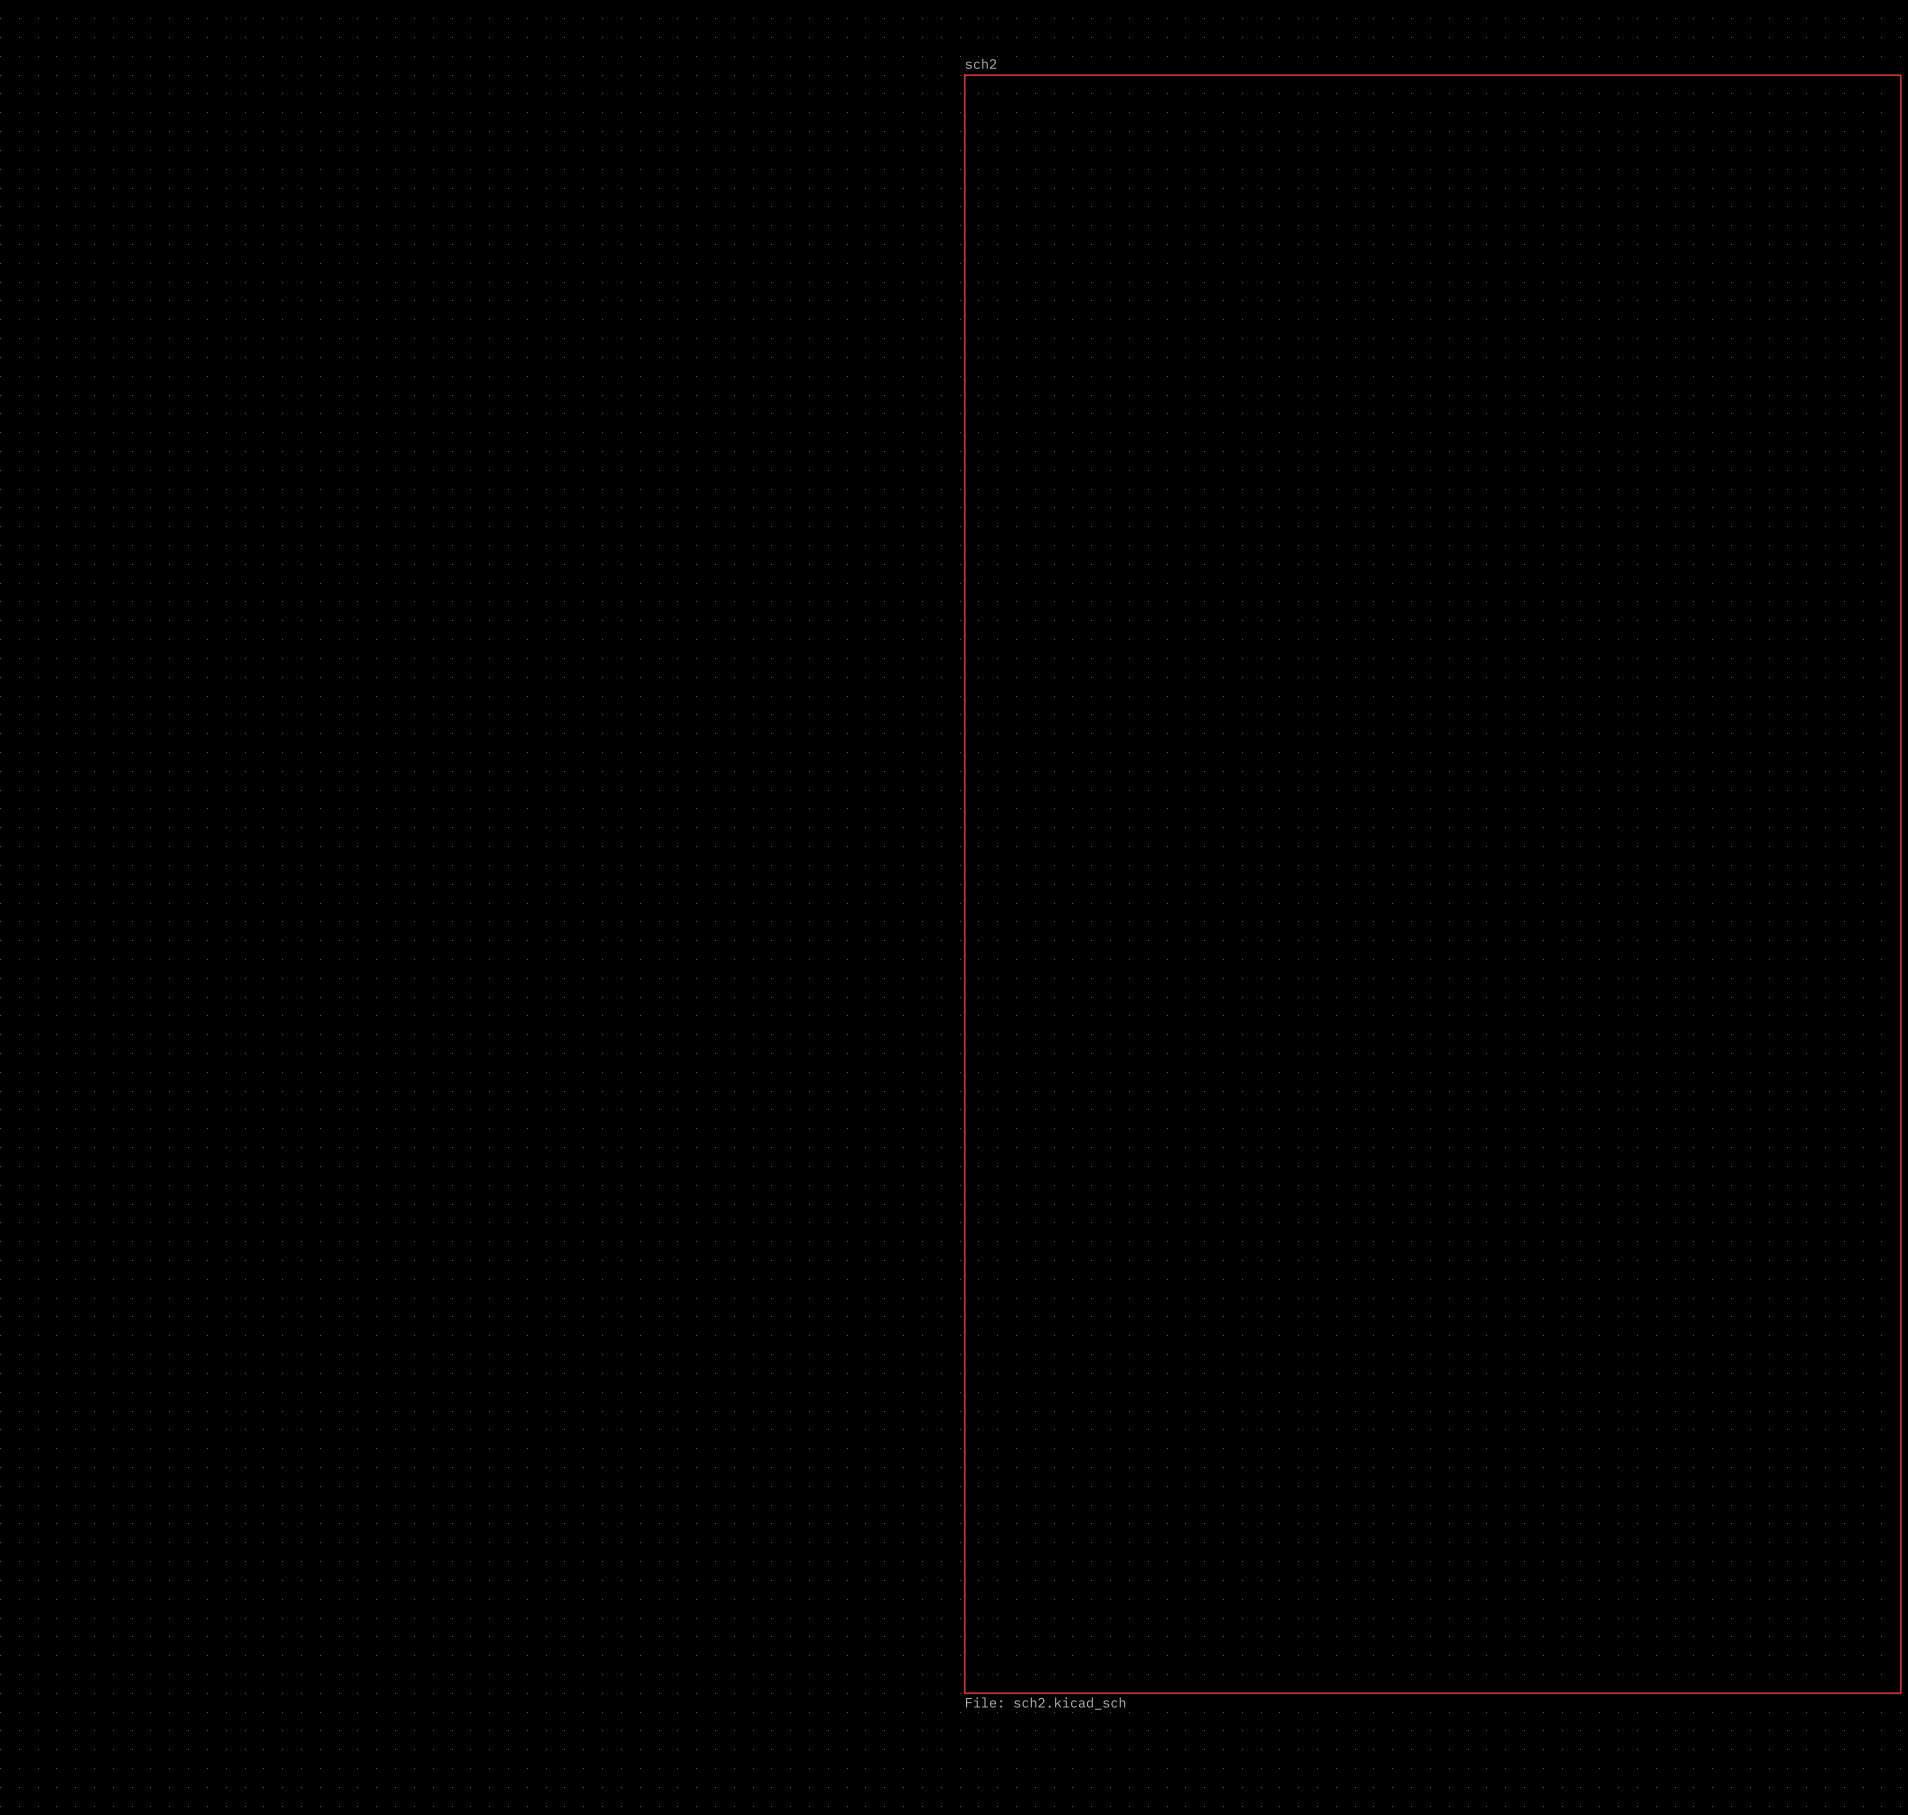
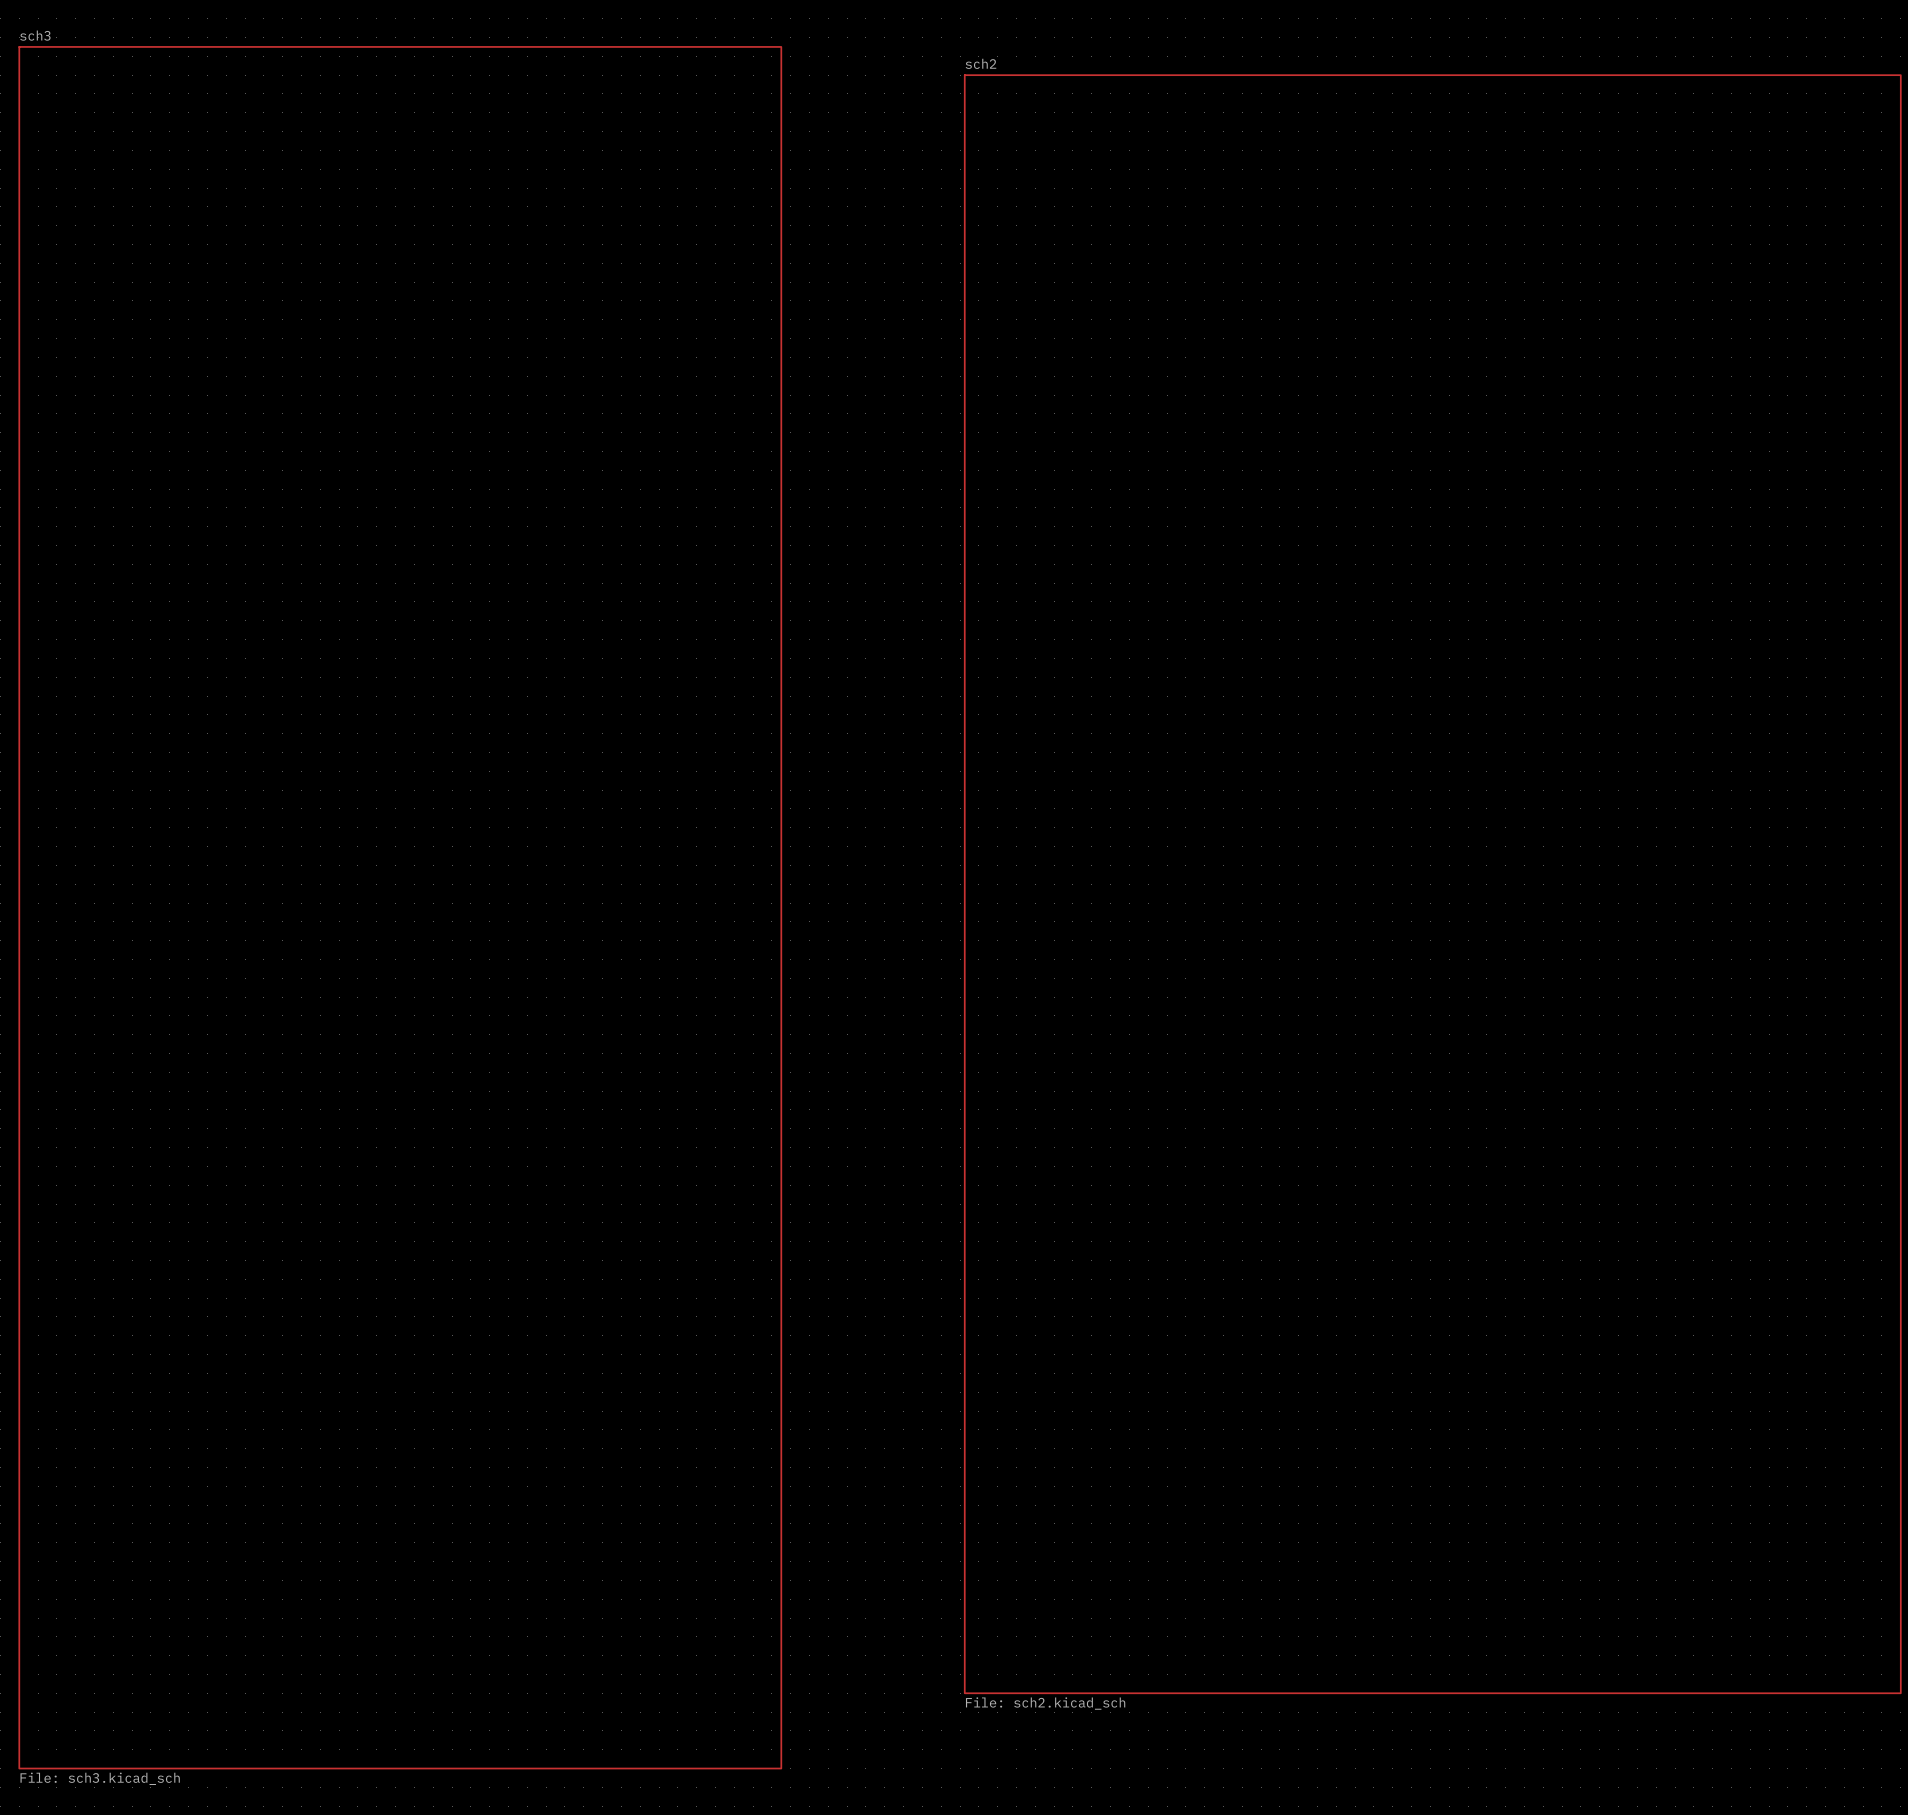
sheet sch3: none -> File: sch3.kicad_sch (400, 907)

